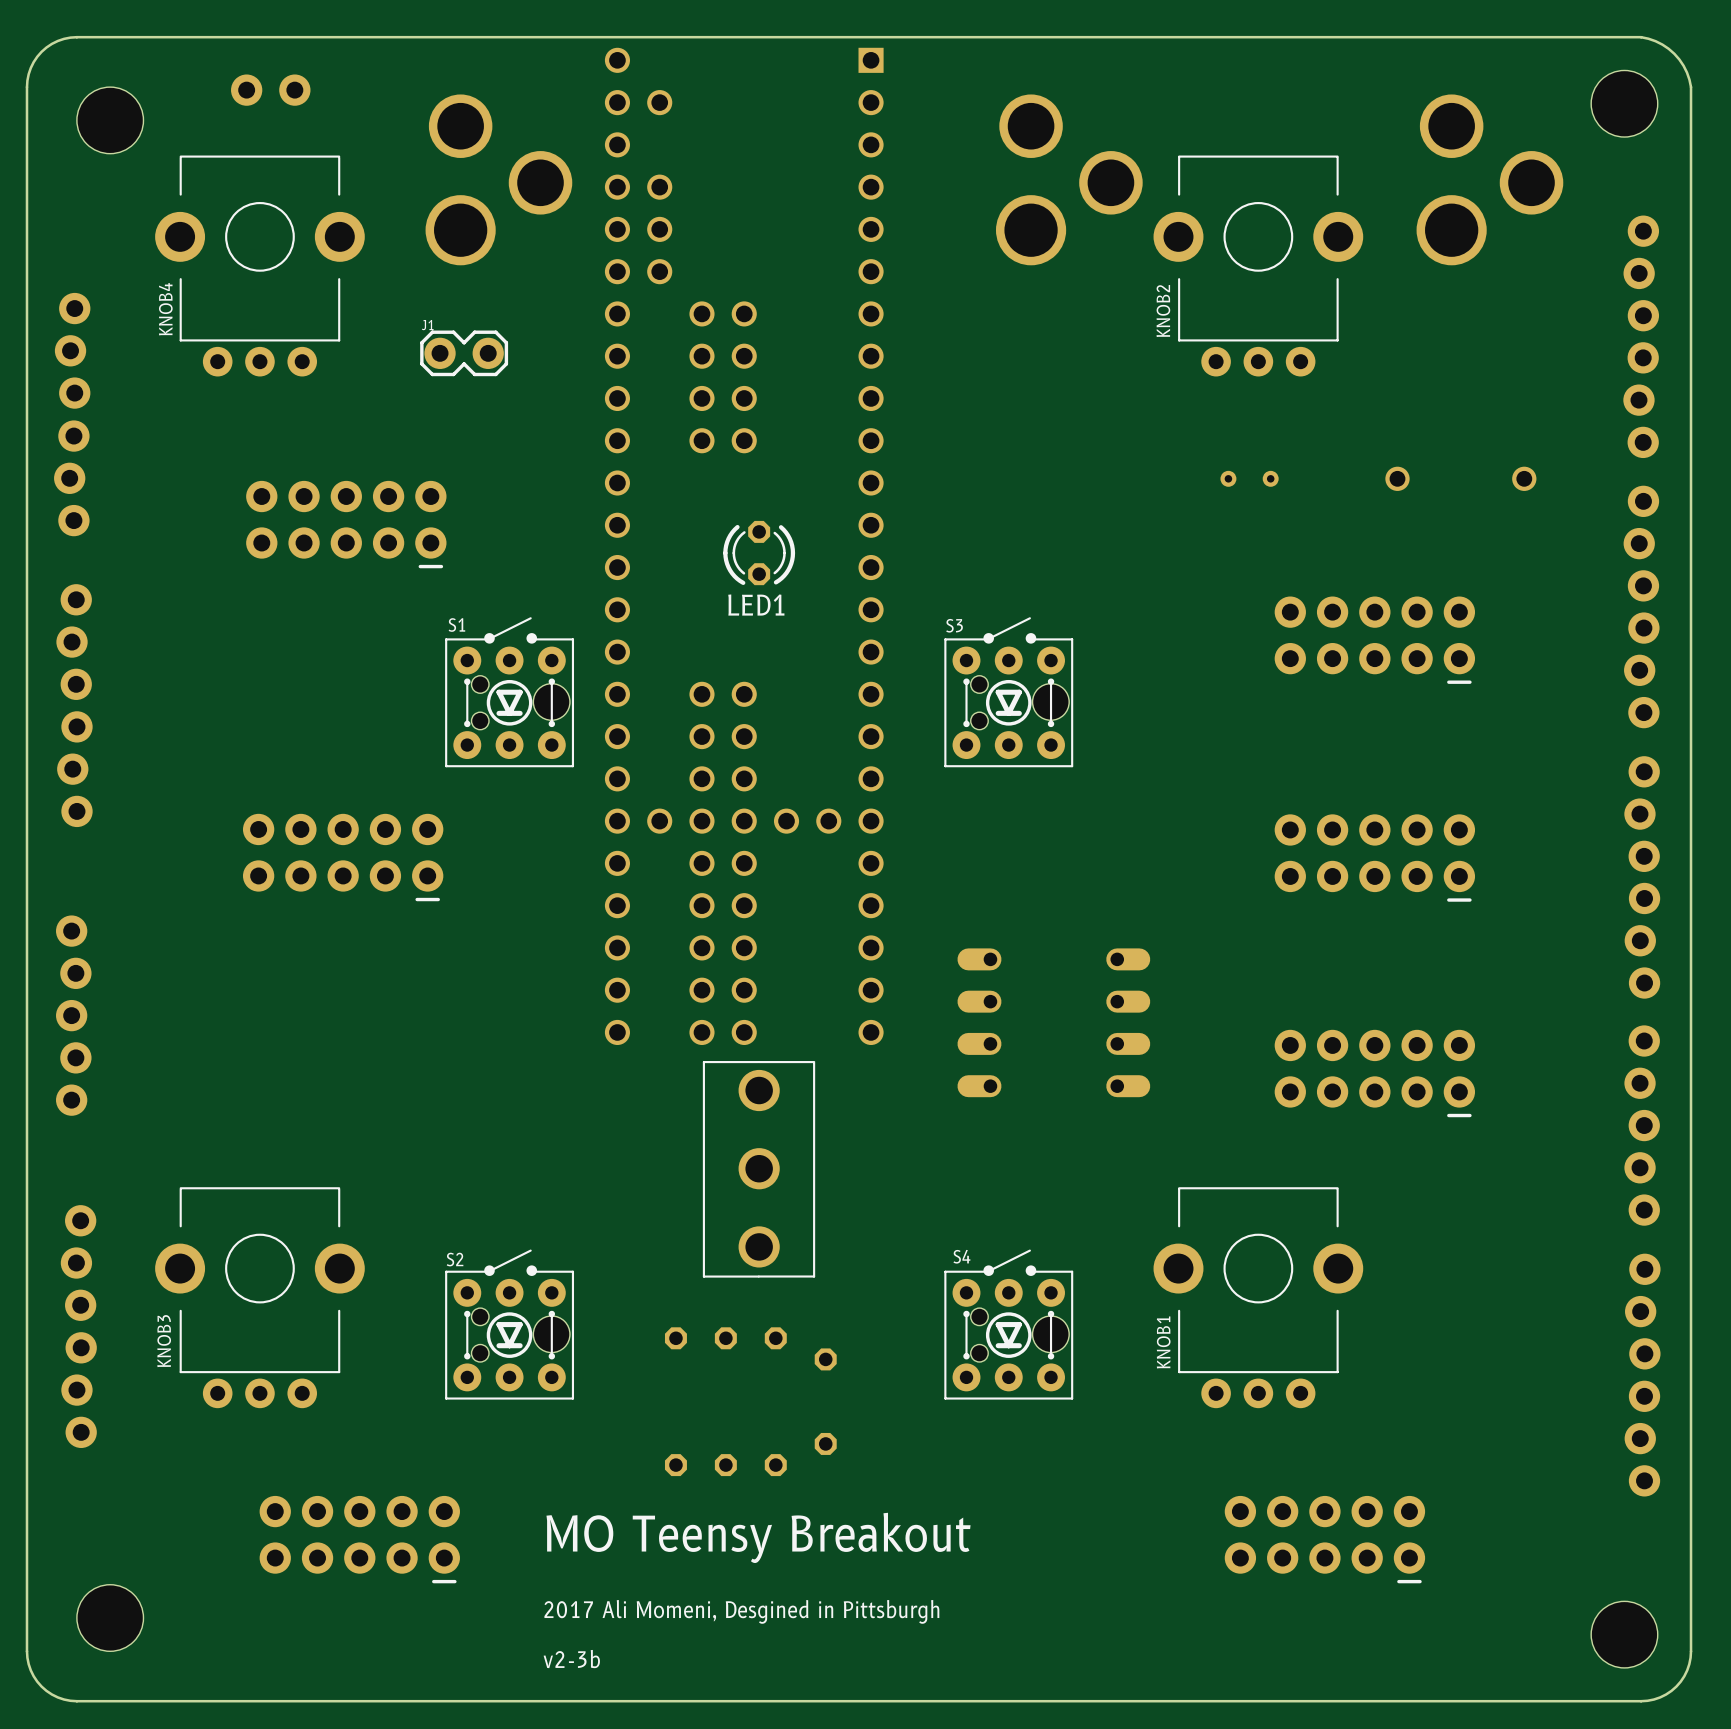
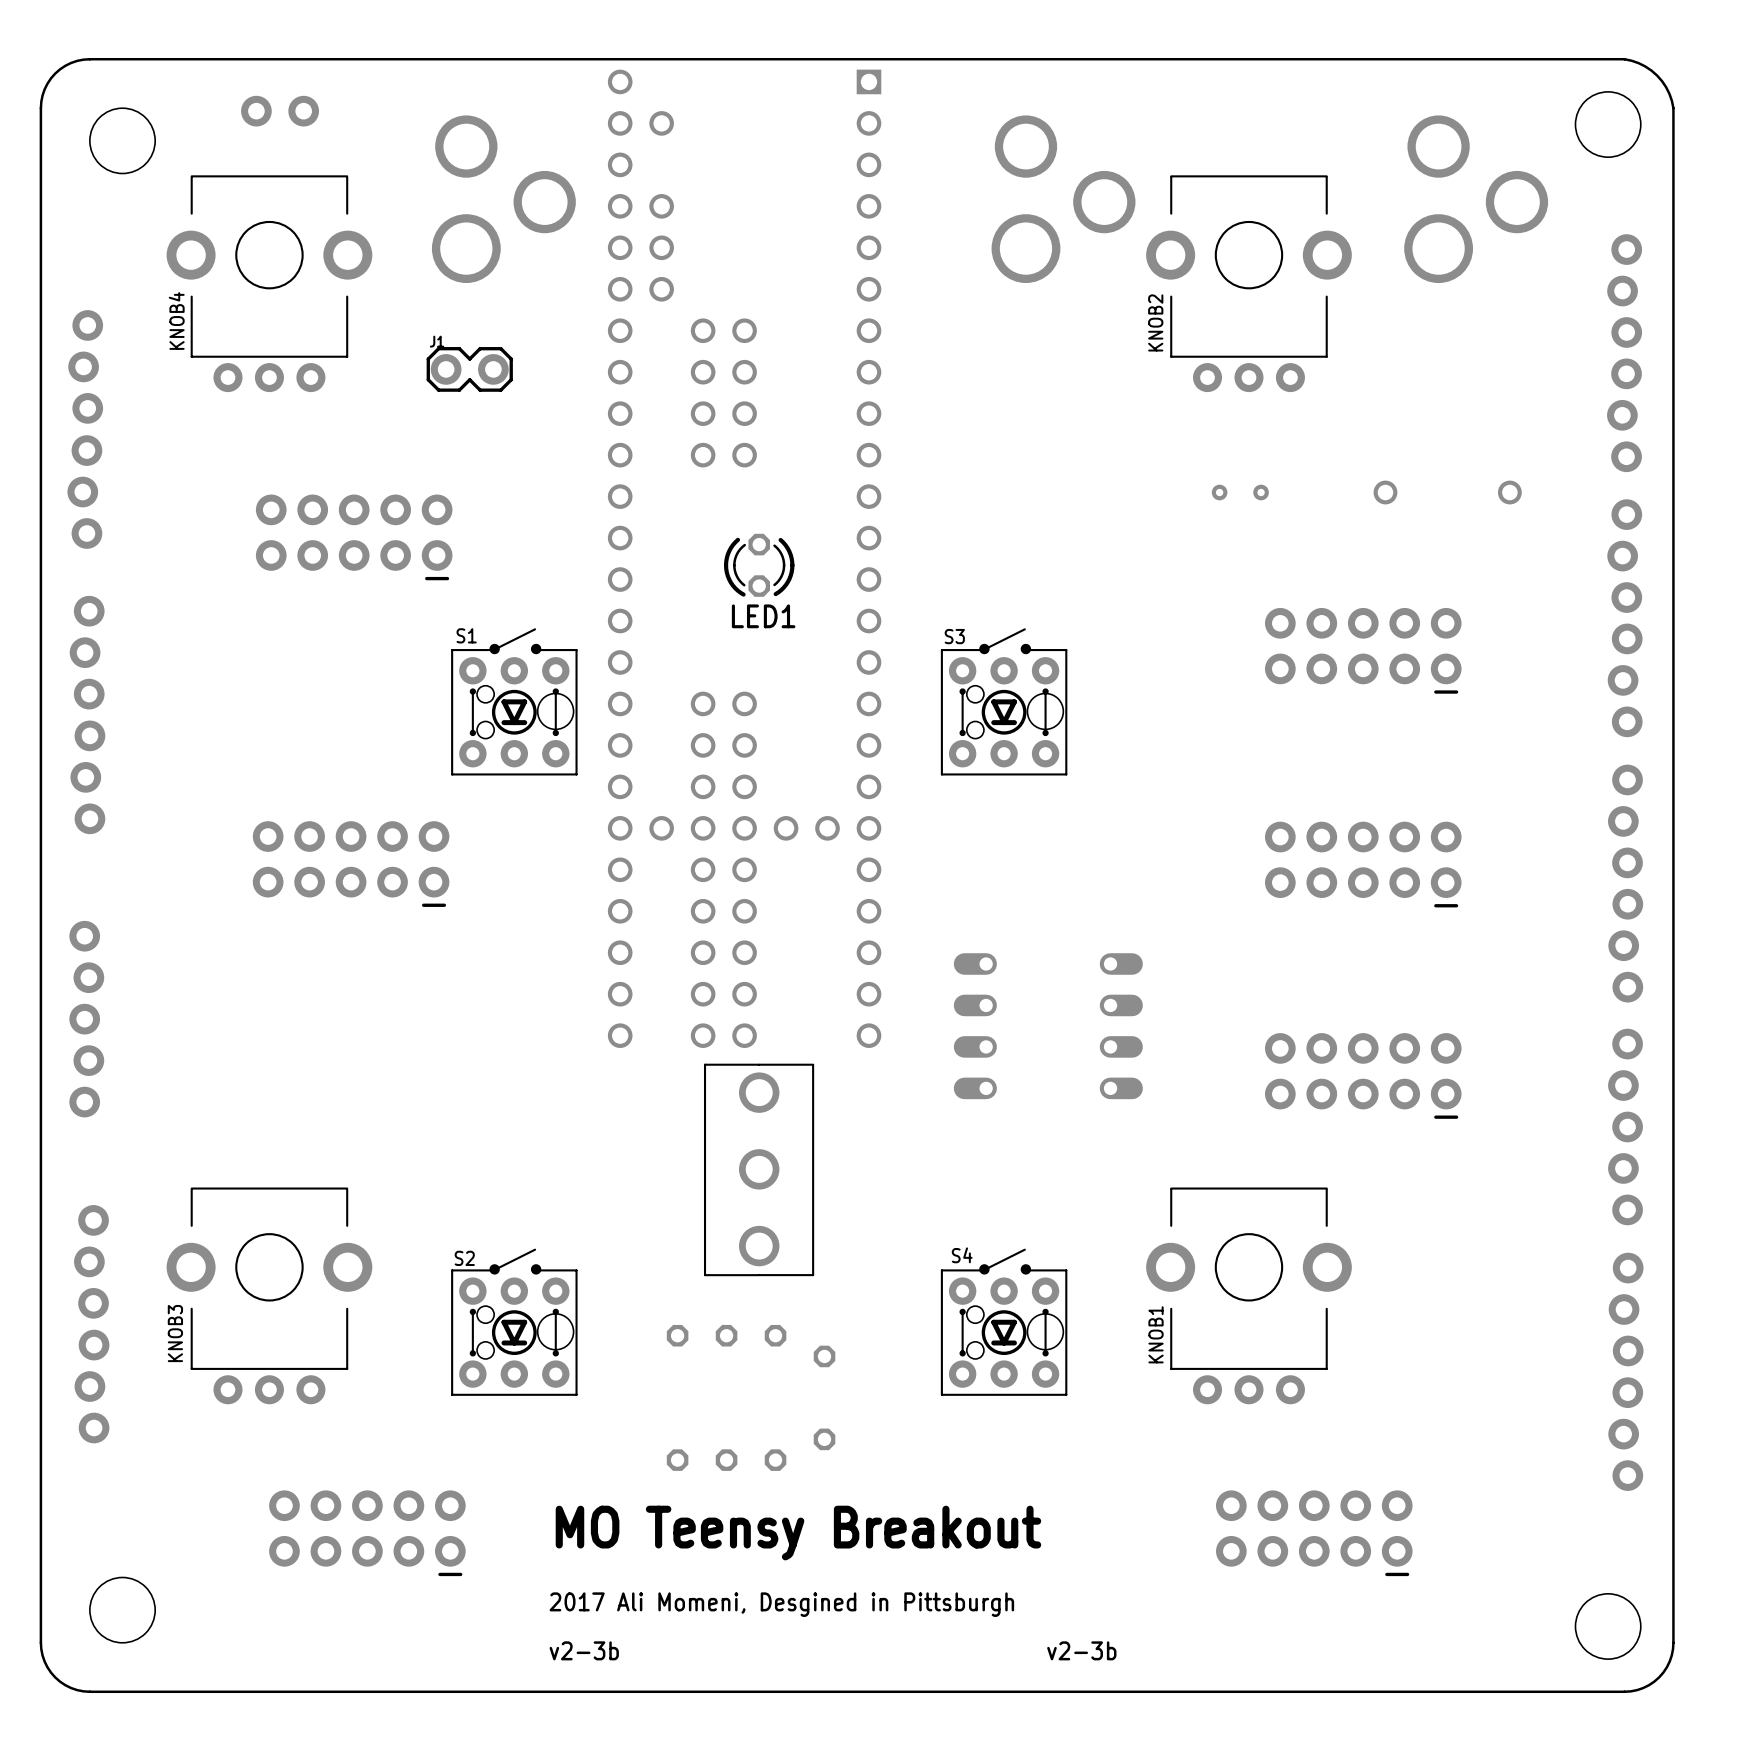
text: none -> v2-3b (1081, 1650)

